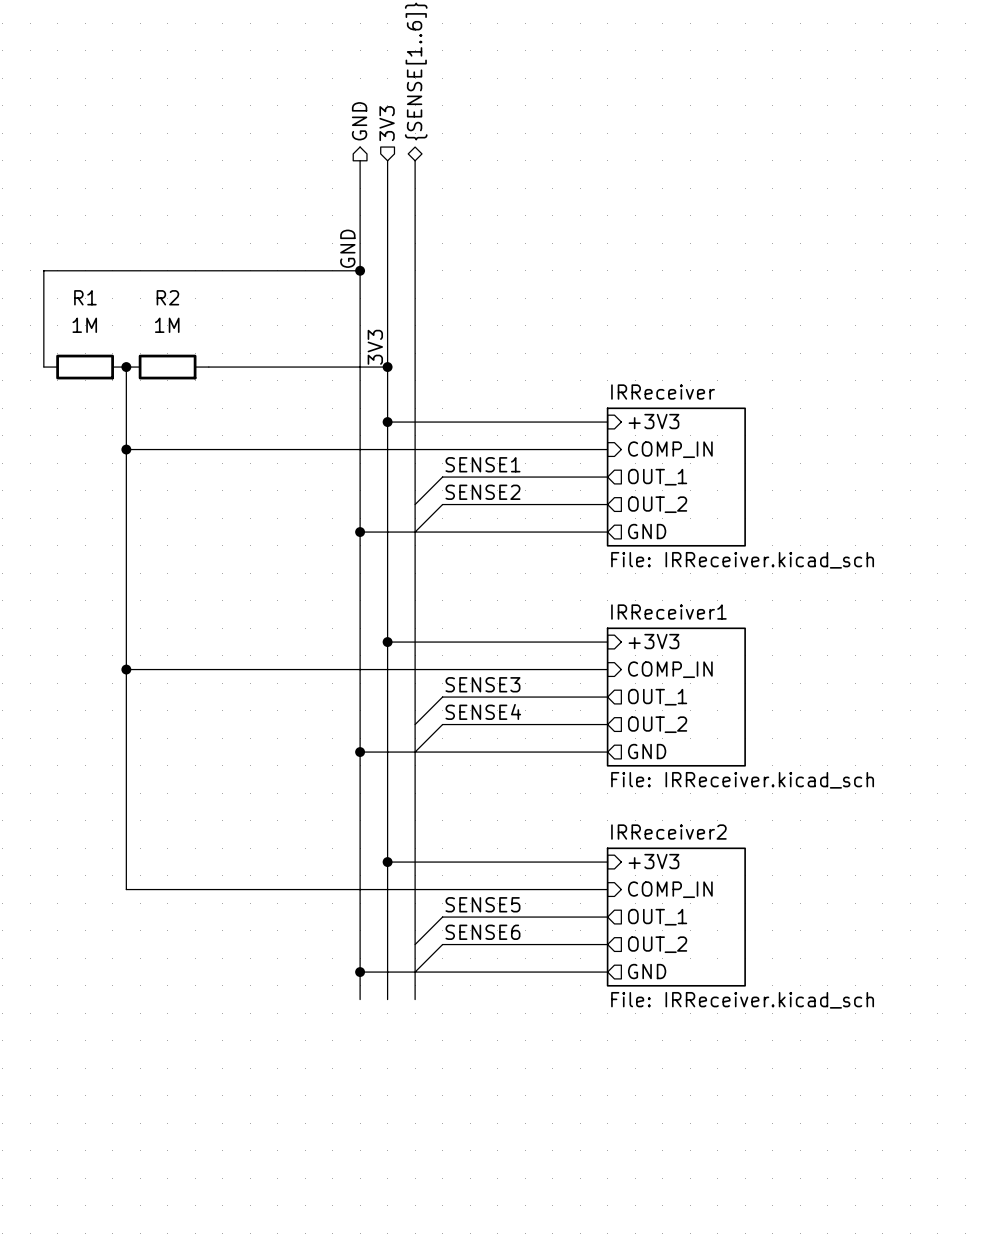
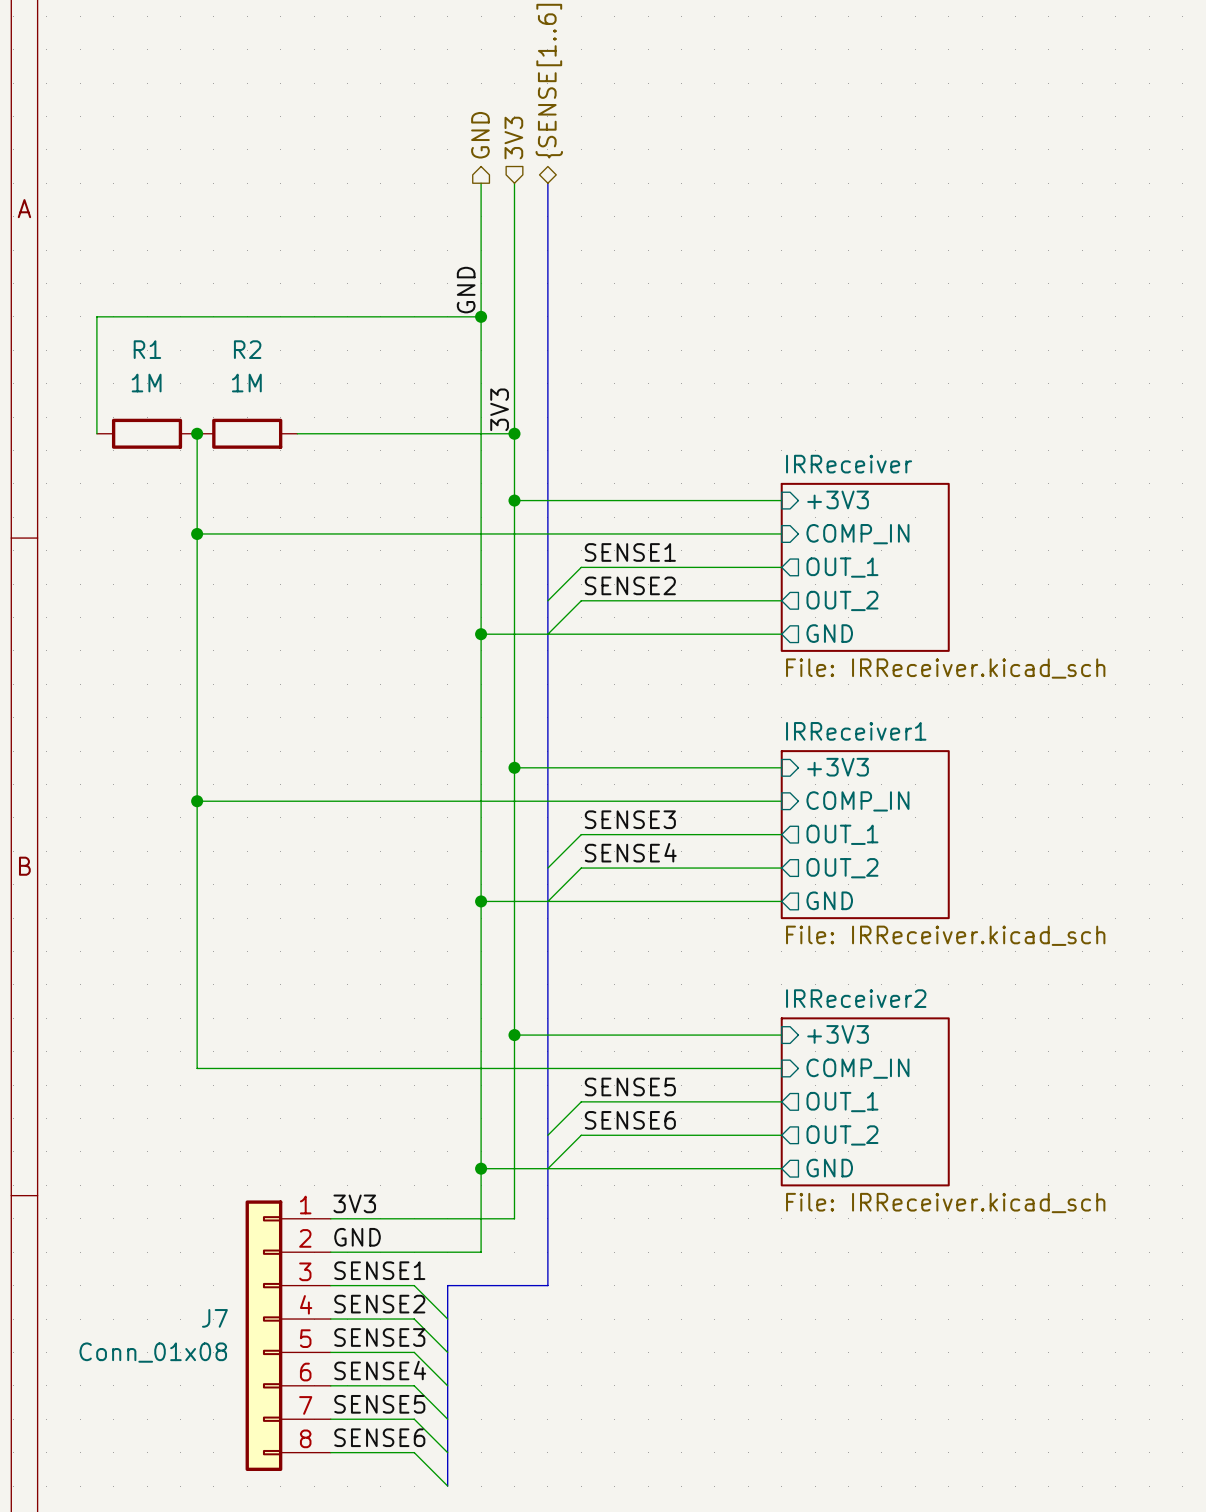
wire: none -> (481, 1202) (481, 1252) (330, 1252)
wire: none -> (514, 1202) (514, 1218) (330, 1218)
bus: none -> (547, 1202) (547, 1285) (447, 1285) (447, 1486)
label: none -> 3V3 (354, 1203)
label: none -> GND (357, 1237)
label: none -> SENSE1 (379, 1270)
wire: none -> (330, 1285) (414, 1285) (447, 1319)
label: none -> SENSE2 (379, 1304)
wire: none -> (330, 1319) (414, 1319) (447, 1352)
J7: none -> Conn_01x08 (288, 1335)
label: none -> SENSE3 (379, 1337)
wire: none -> (330, 1352) (414, 1352) (447, 1385)
label: none -> SENSE4 (380, 1370)
wire: none -> (330, 1385) (414, 1385) (447, 1419)
label: none -> SENSE5 (379, 1404)
wire: none -> (330, 1419) (414, 1419) (447, 1452)
label: none -> SENSE6 (379, 1437)
wire: none -> (330, 1452) (414, 1452) (447, 1486)

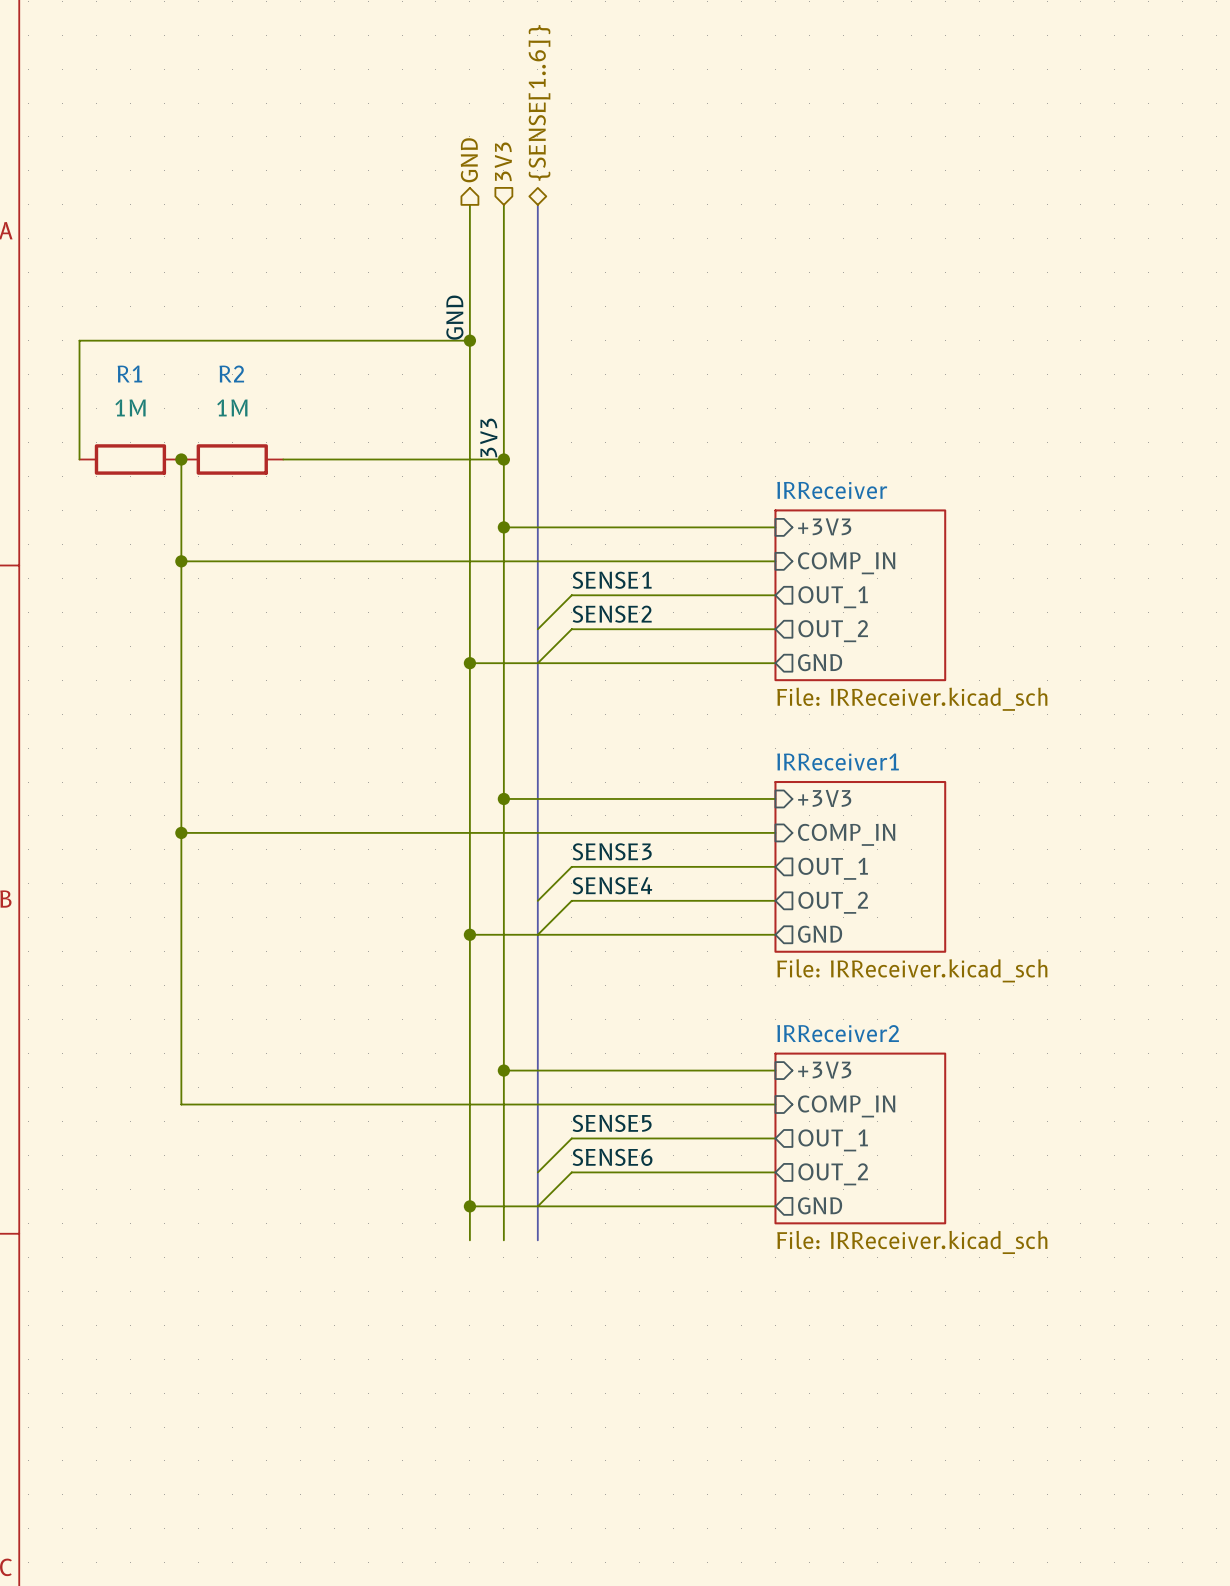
wire: (481, 1202) (481, 1252) (330, 1252) -> none
wire: (514, 1202) (514, 1218) (330, 1218) -> none
bus: (547, 1202) (547, 1285) (447, 1285) (447, 1486) -> none
label: 3V3 (354, 1203) -> none
label: GND (357, 1237) -> none
label: SENSE1 (379, 1270) -> none
wire: (330, 1285) (414, 1285) (447, 1319) -> none
label: SENSE2 (379, 1304) -> none
wire: (330, 1319) (414, 1319) (447, 1352) -> none
J7: Conn_01x08 (288, 1335) -> none
label: SENSE3 (379, 1337) -> none
wire: (330, 1352) (414, 1352) (447, 1385) -> none
label: SENSE4 (380, 1370) -> none
wire: (330, 1385) (414, 1385) (447, 1419) -> none
label: SENSE5 (379, 1404) -> none
wire: (330, 1419) (414, 1419) (447, 1452) -> none
label: SENSE6 (379, 1437) -> none
wire: (330, 1452) (414, 1452) (447, 1486) -> none

